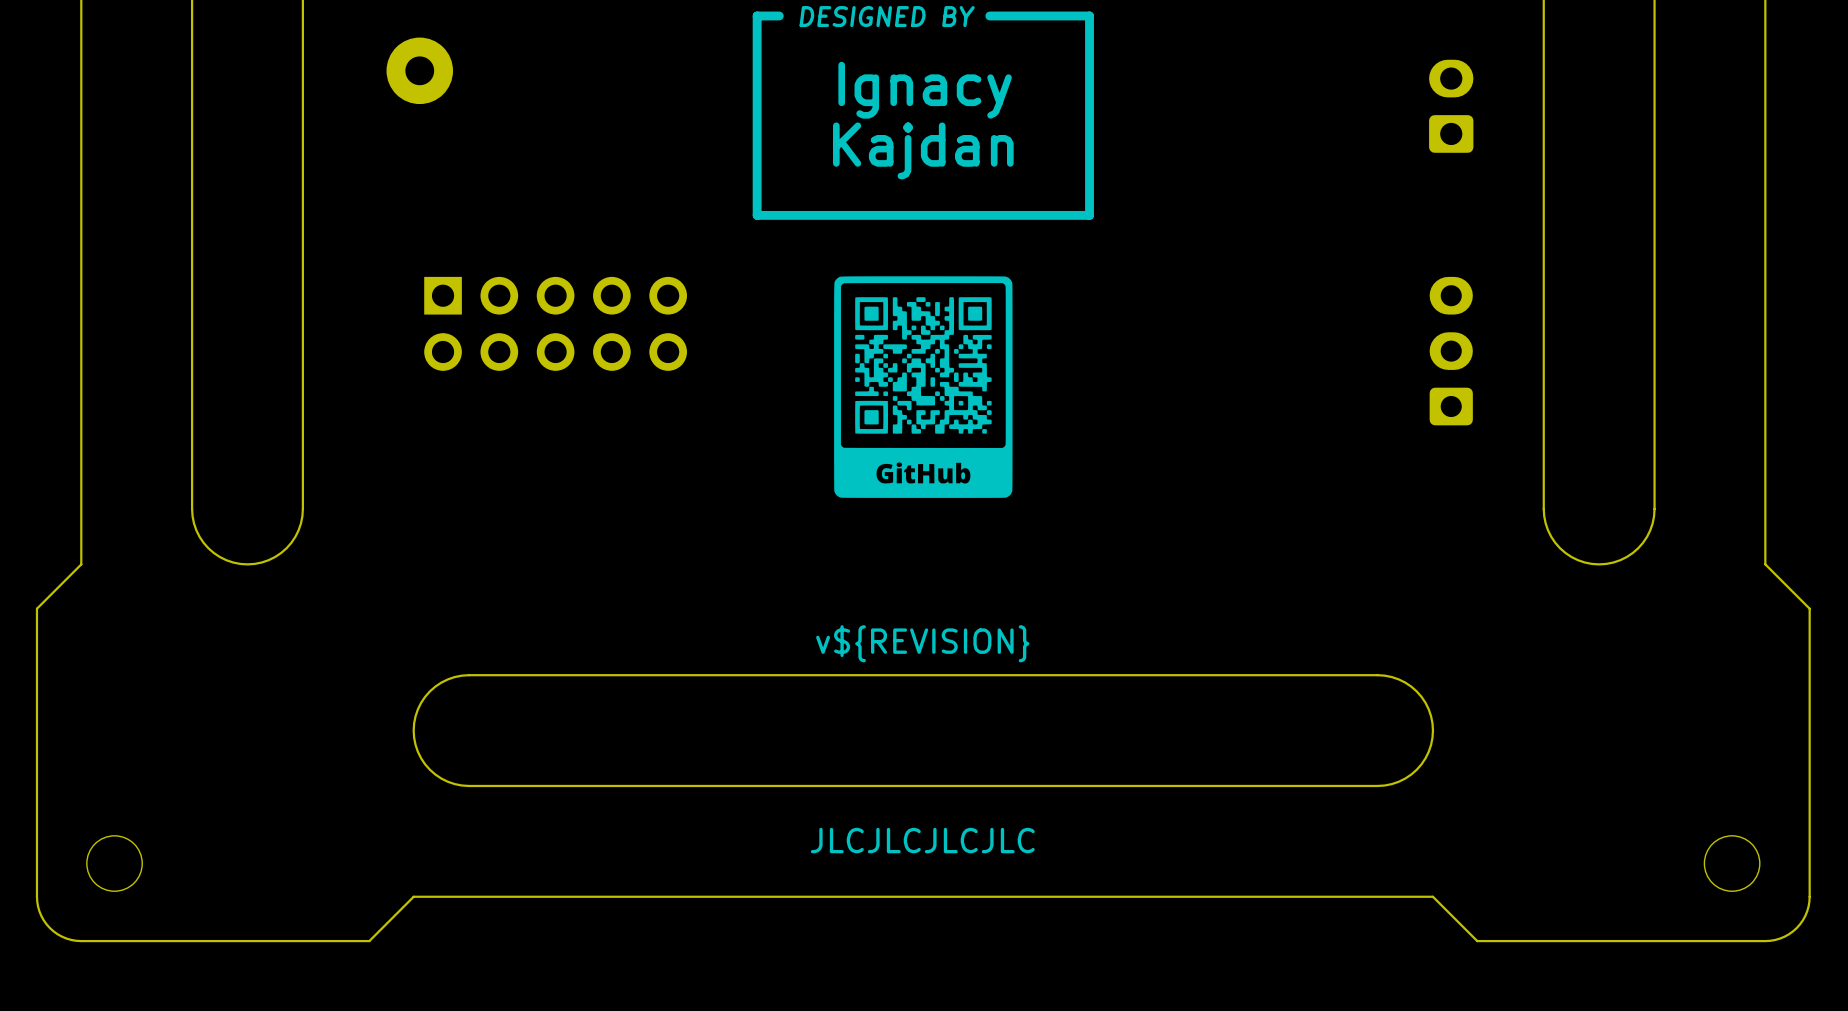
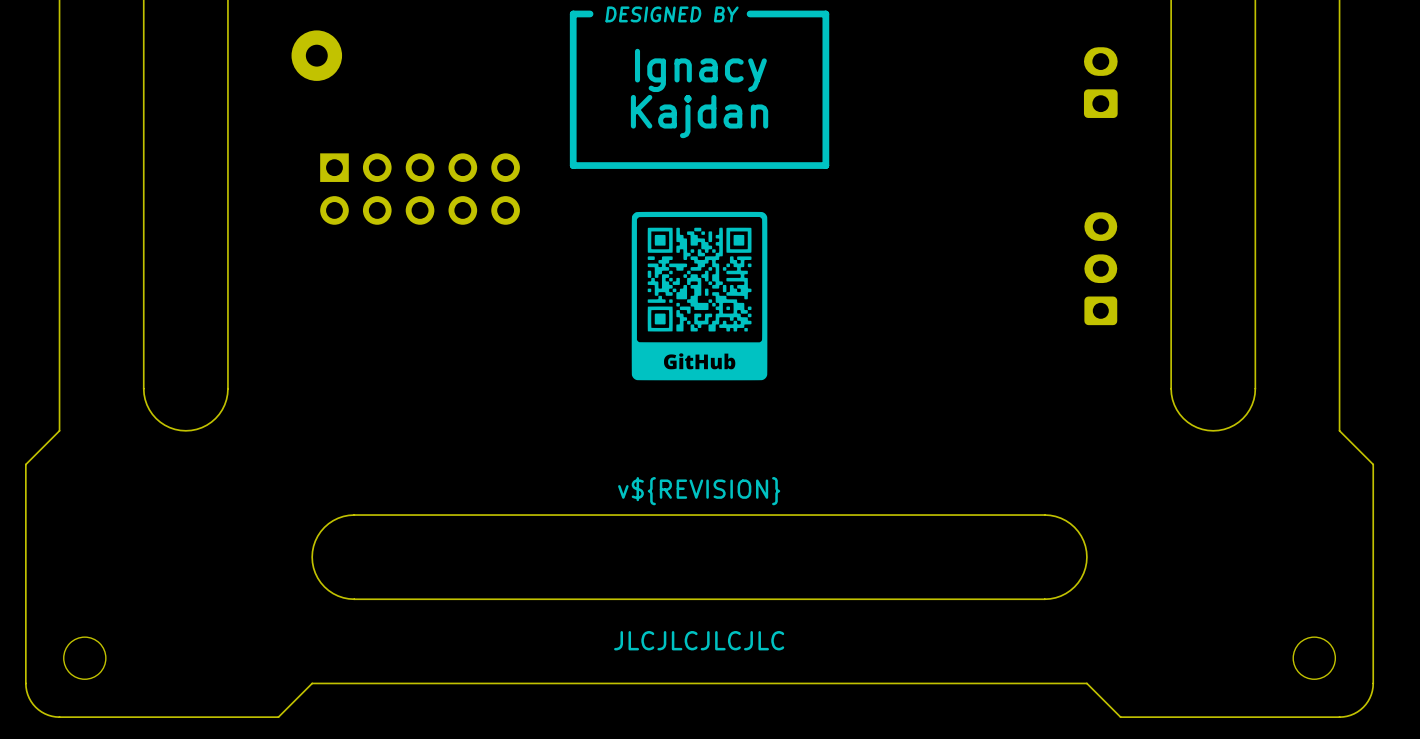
part position: (555, 323) -> (420, 189)

